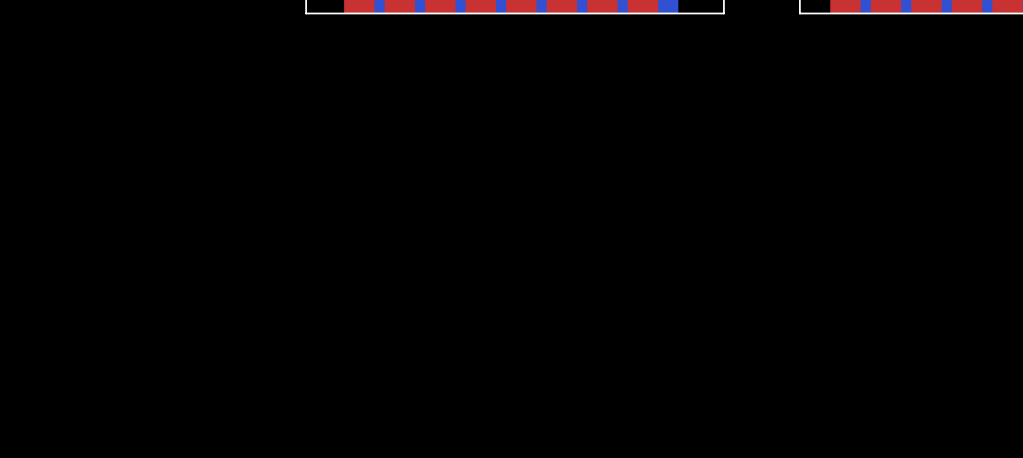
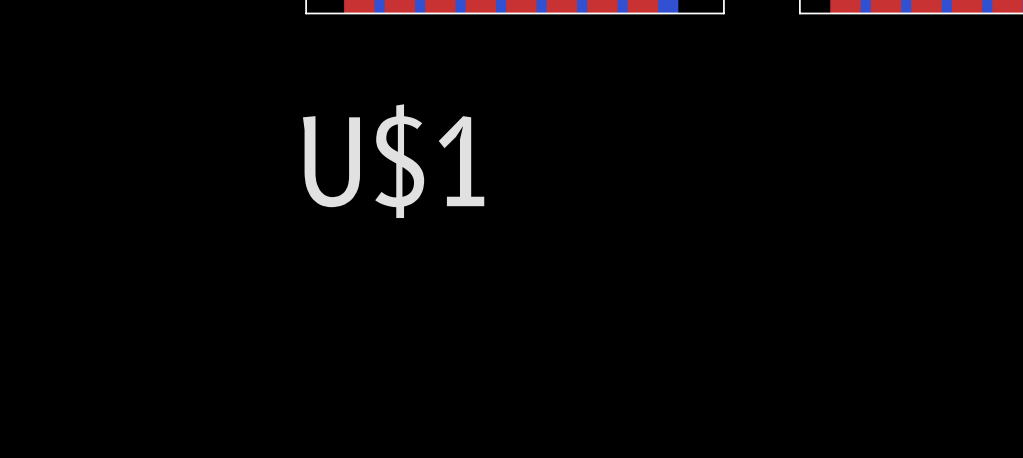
U$1 name: none -> U$1 (393, 161)

